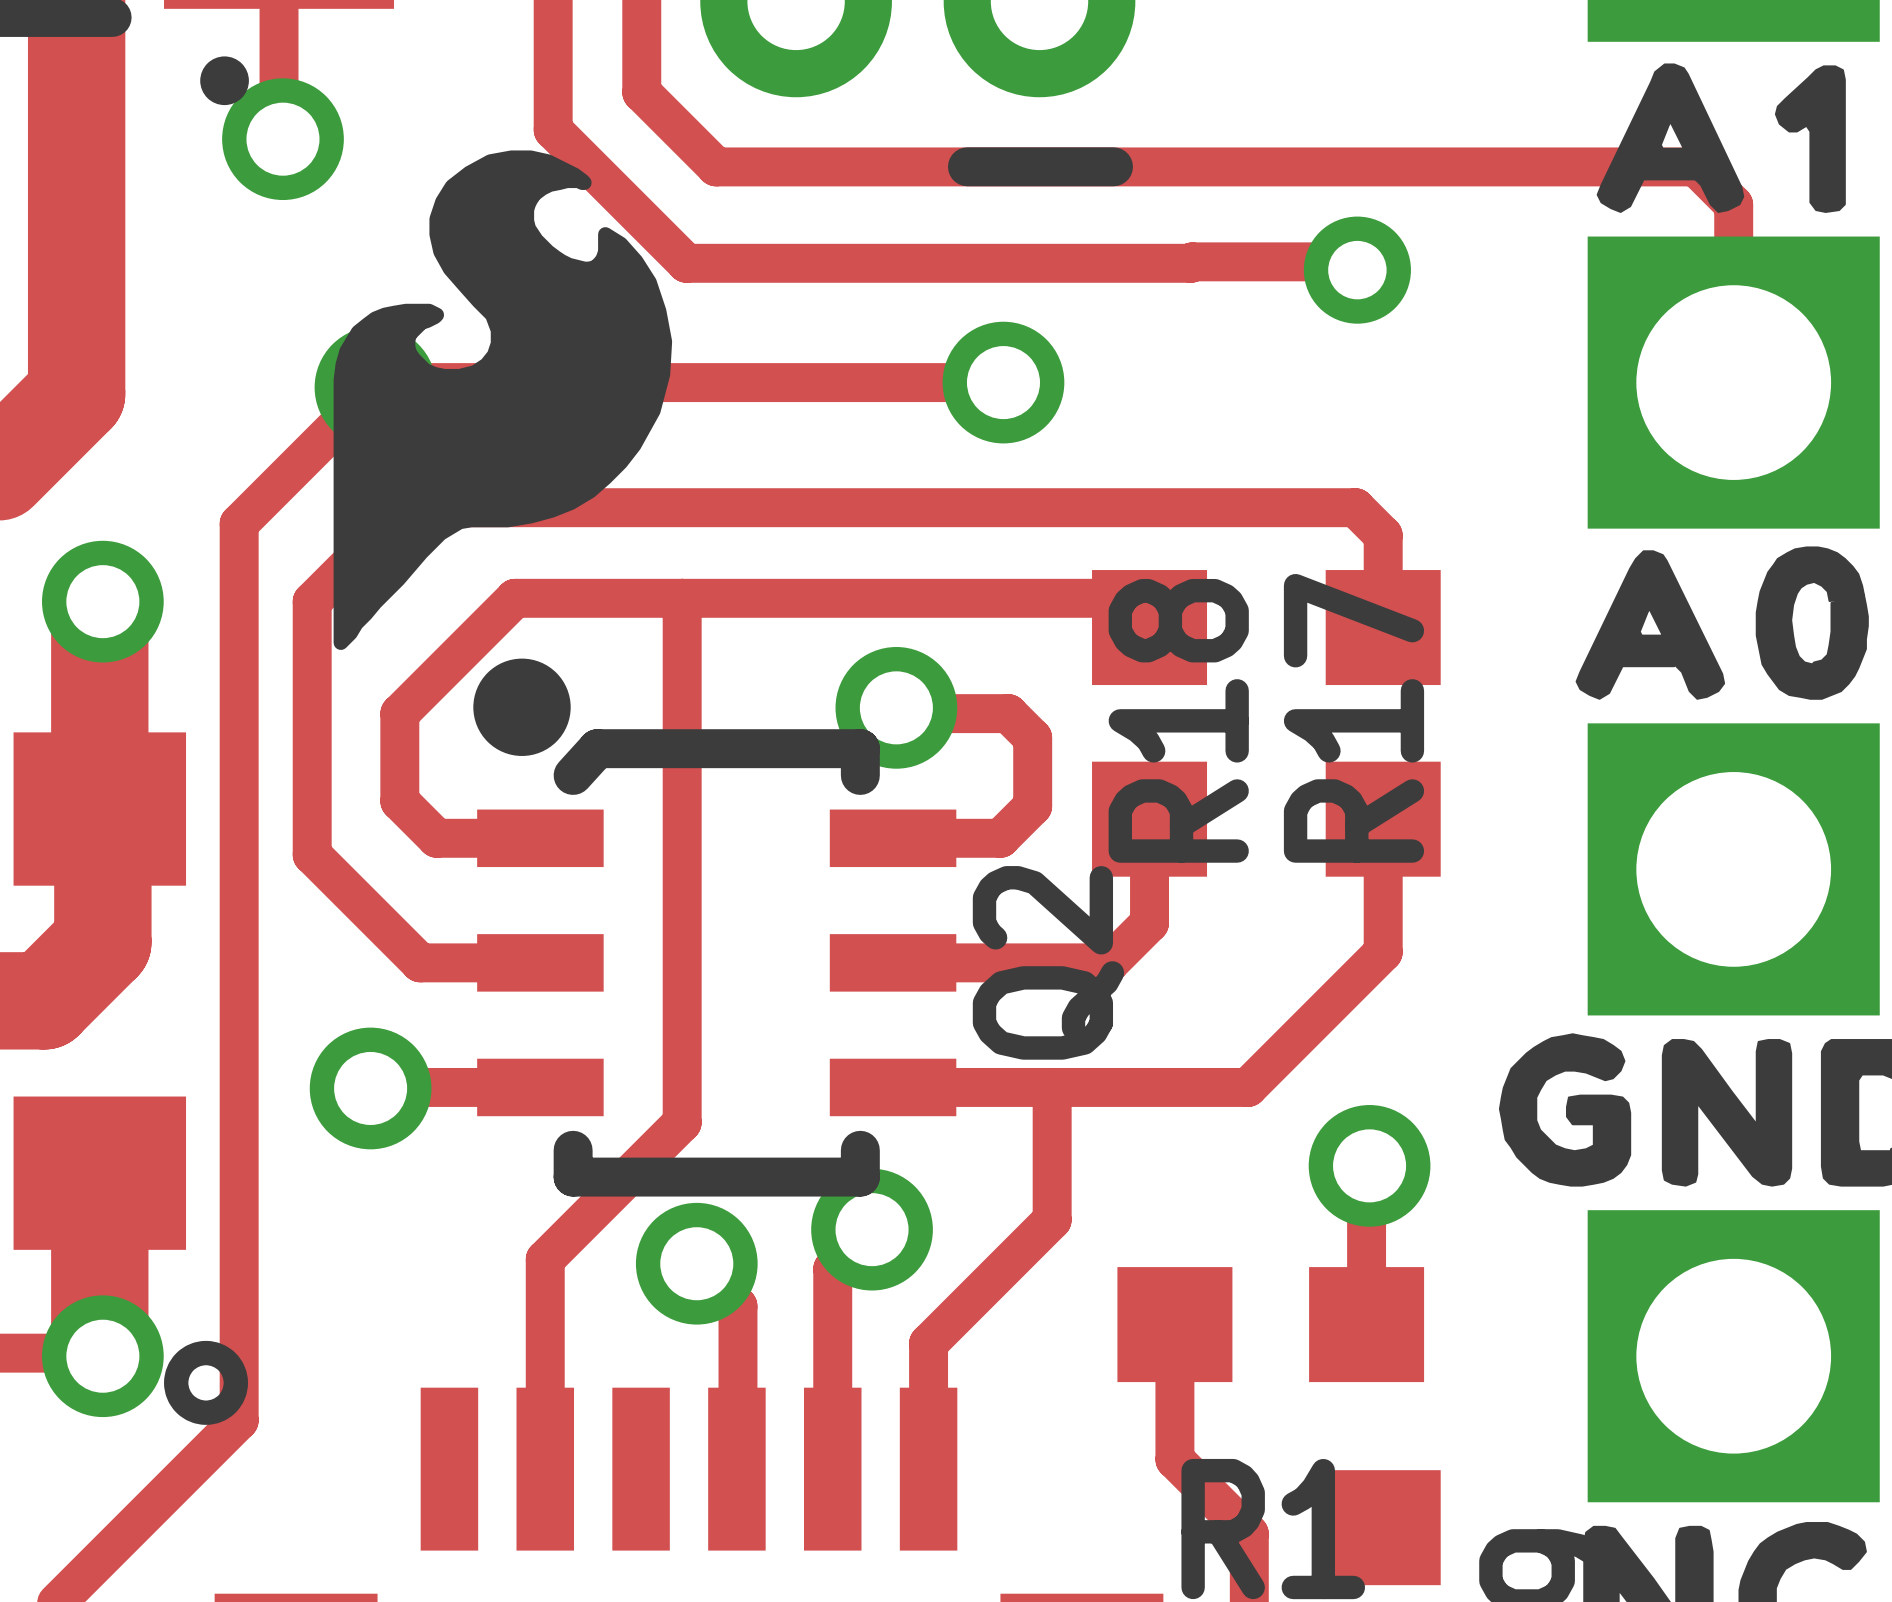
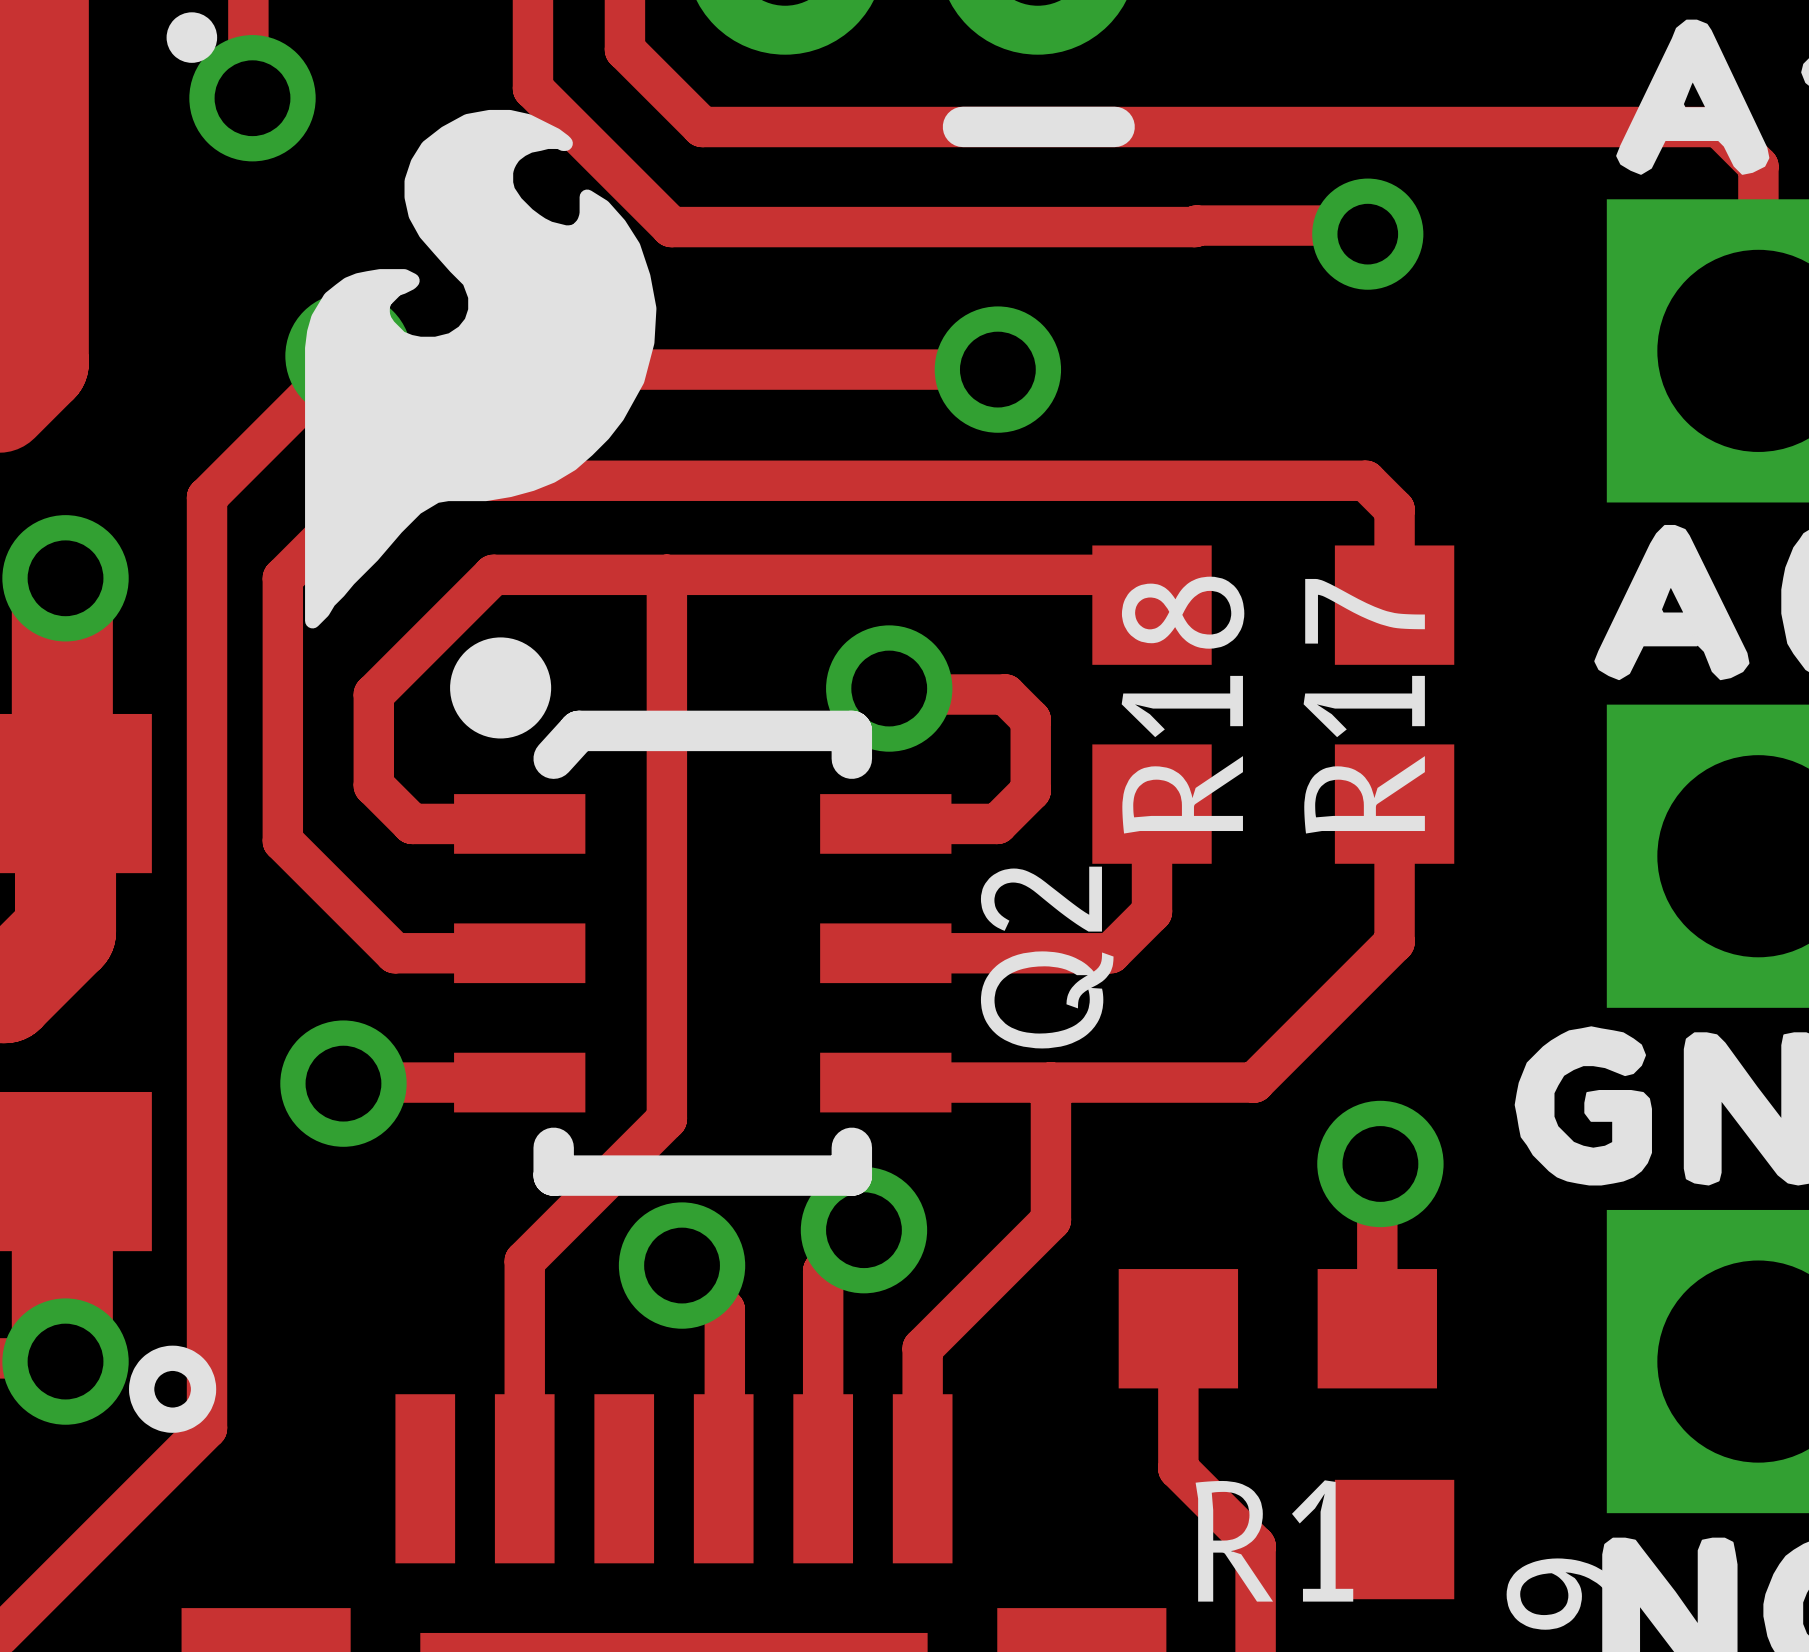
track: (1003, 382) (380, 382) (375, 387) -> (997, 369) (362, 369) (348, 355)
part position: (1003, 382) -> (997, 369)

